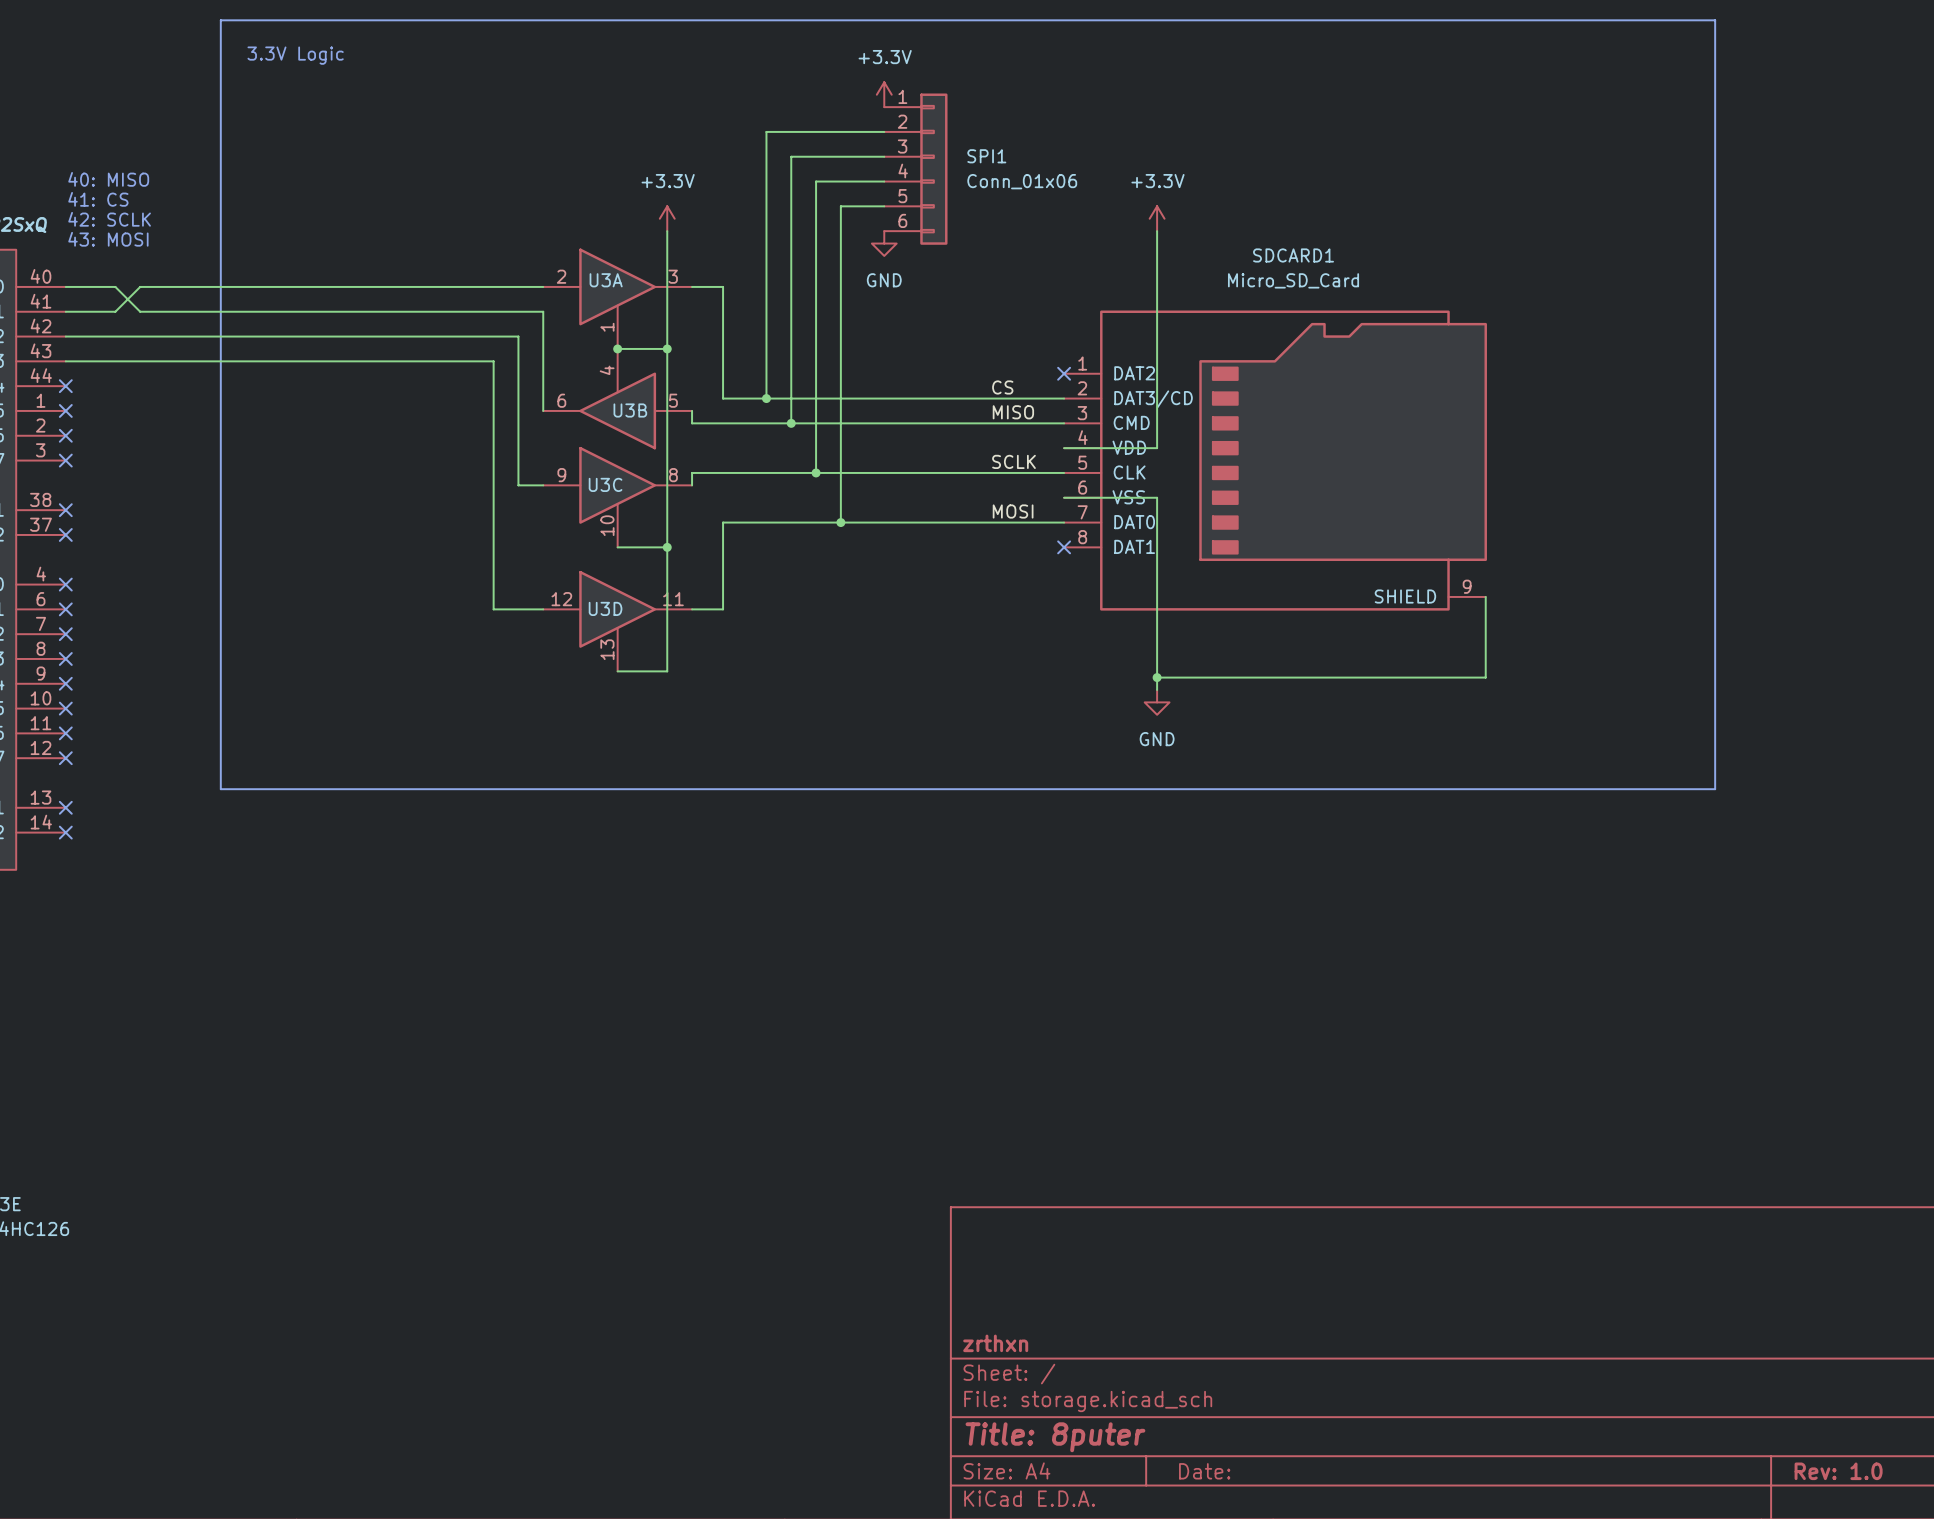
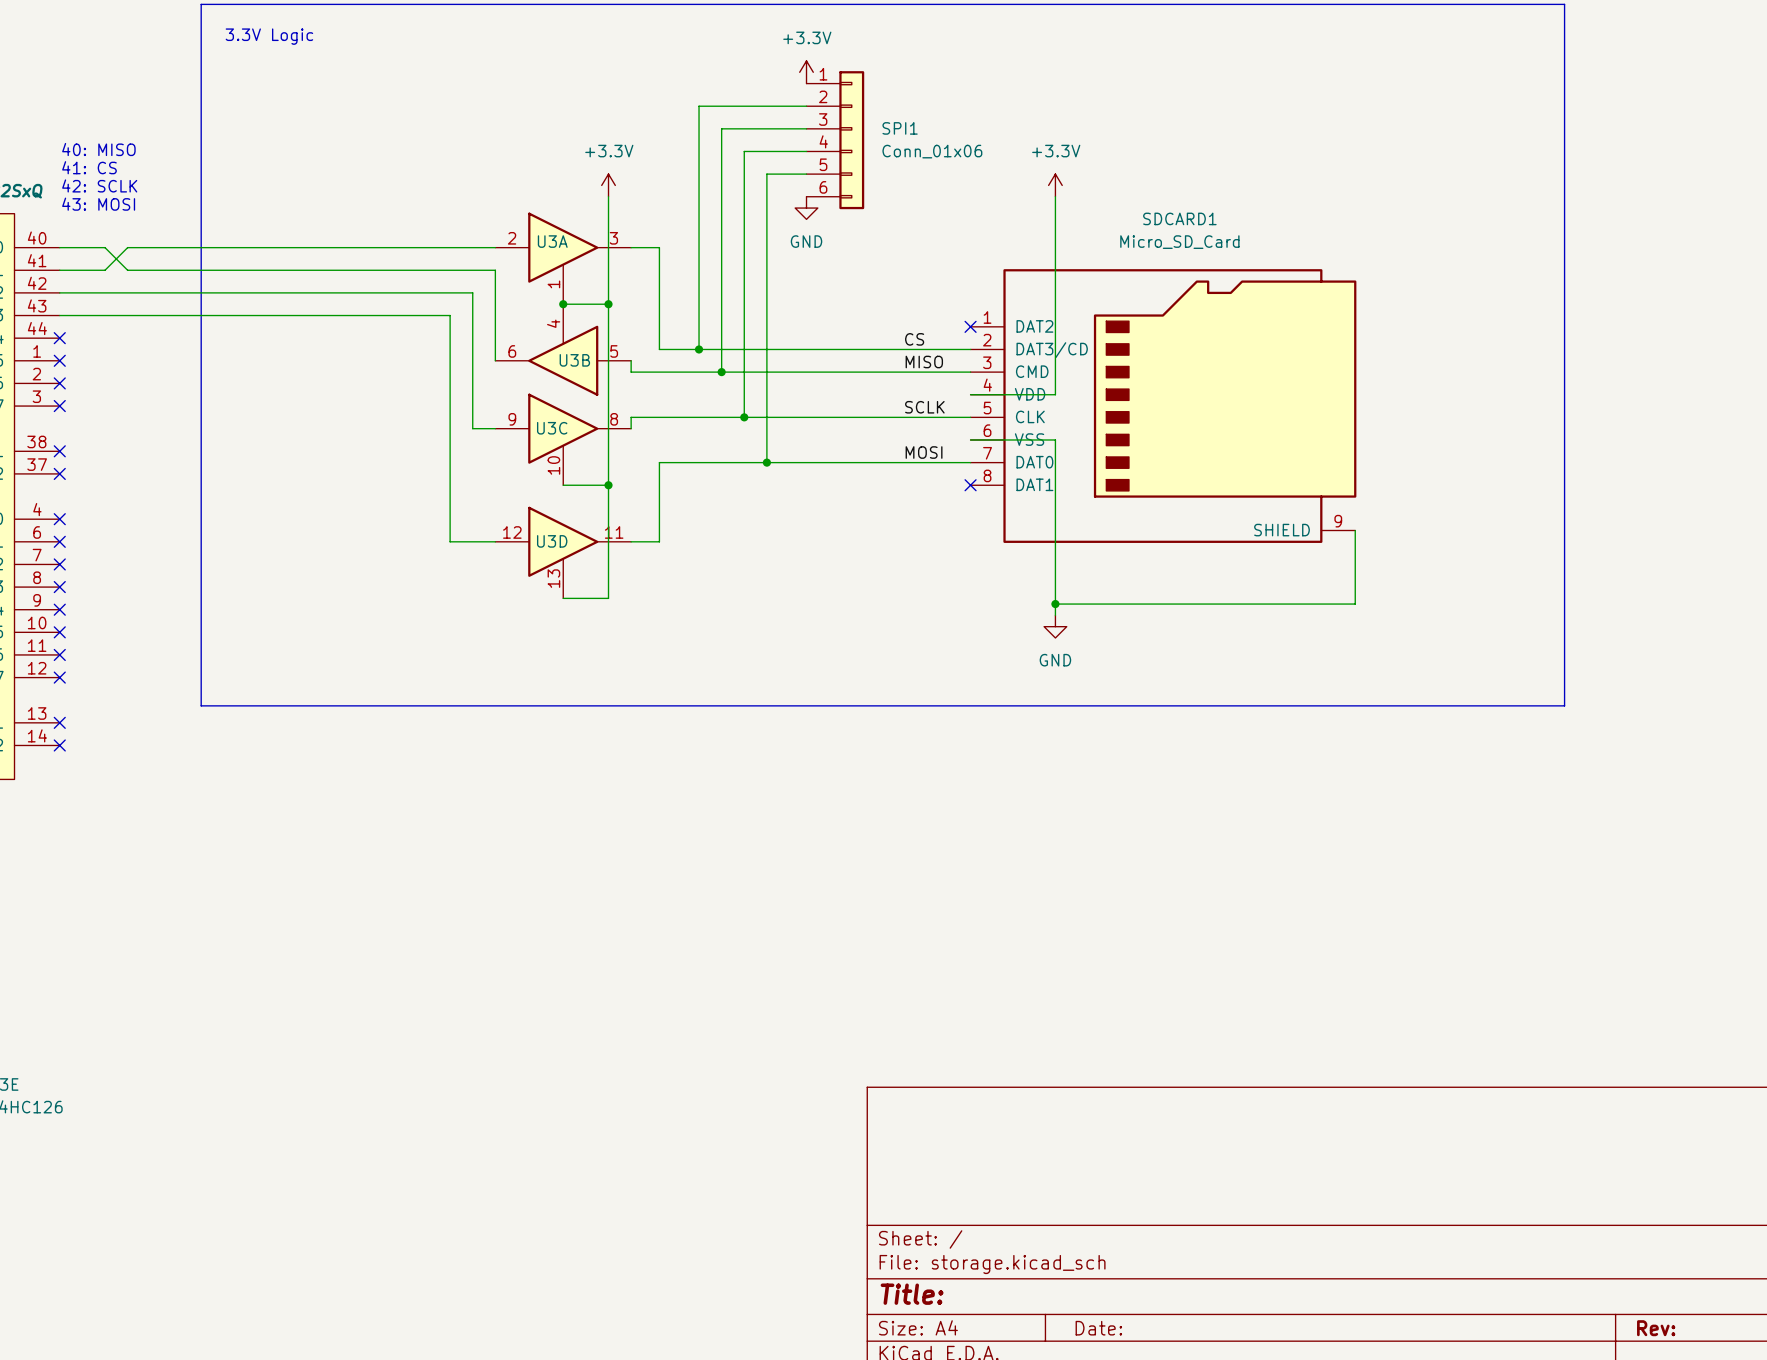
title block: zrthxn (995, 1343) -> none
title block: Title: 8puter (1055, 1437) -> Title: (912, 1294)
title block: Rev: 1.0 (1838, 1471) -> Rev: (1656, 1328)

